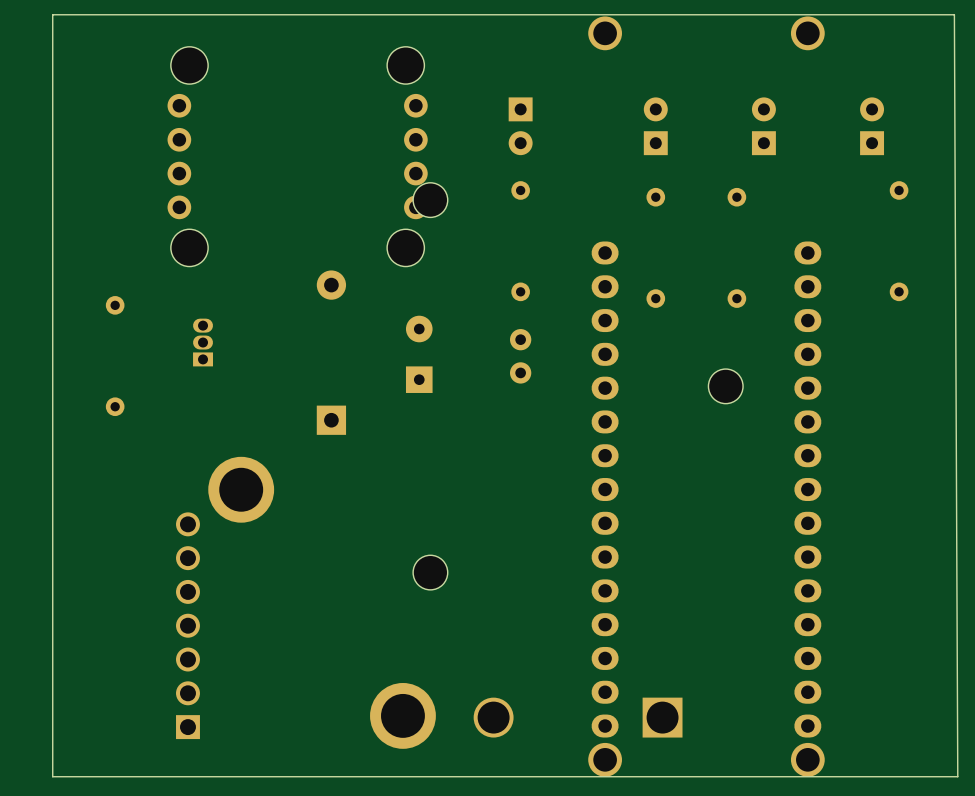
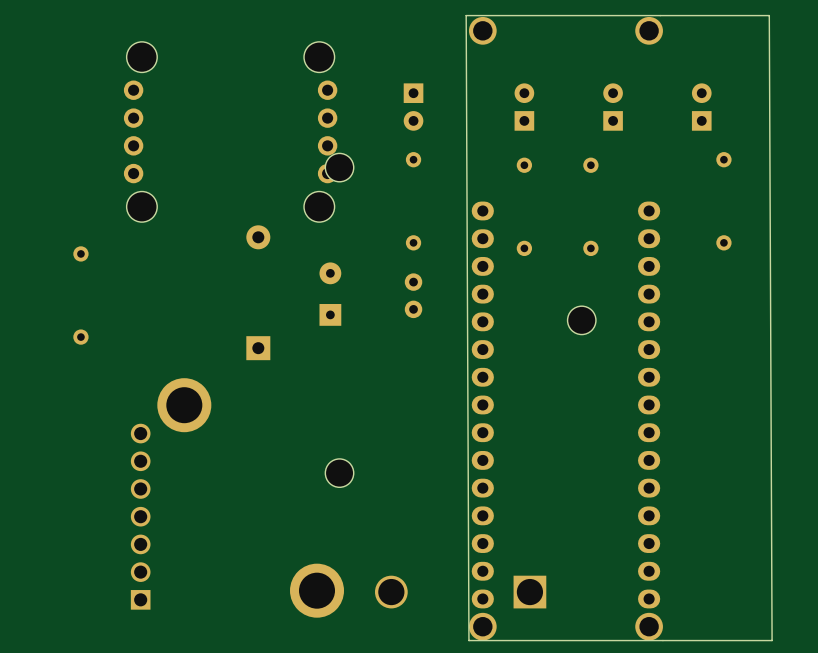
board edge: (584, 14) (52, 14) (52, 776) (588, 776) -> (466, 15) (468, 640)
part: (203, 342) -> none

